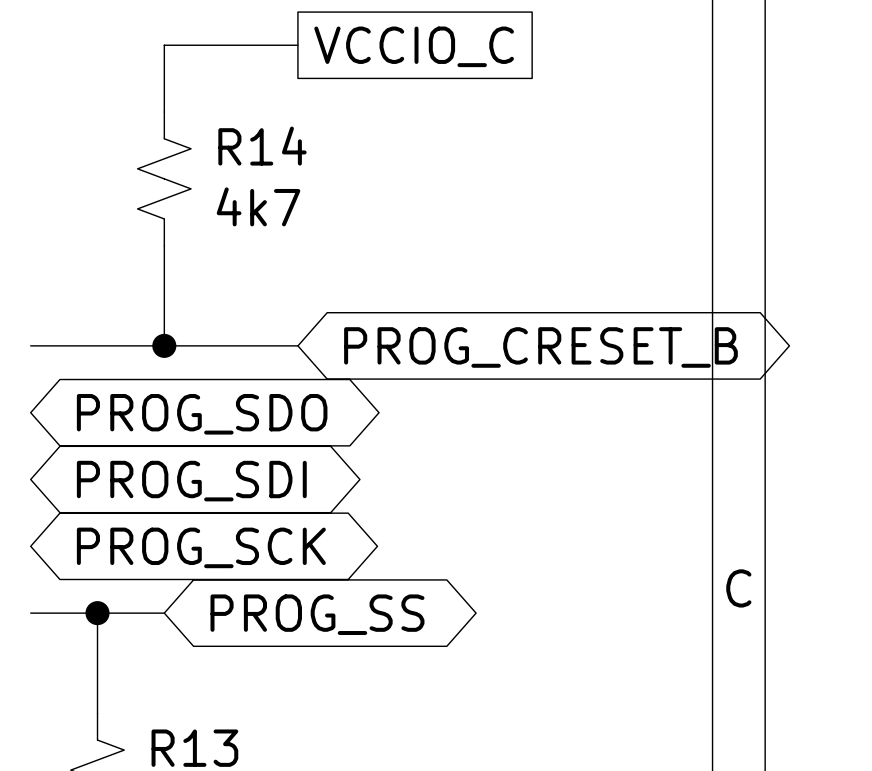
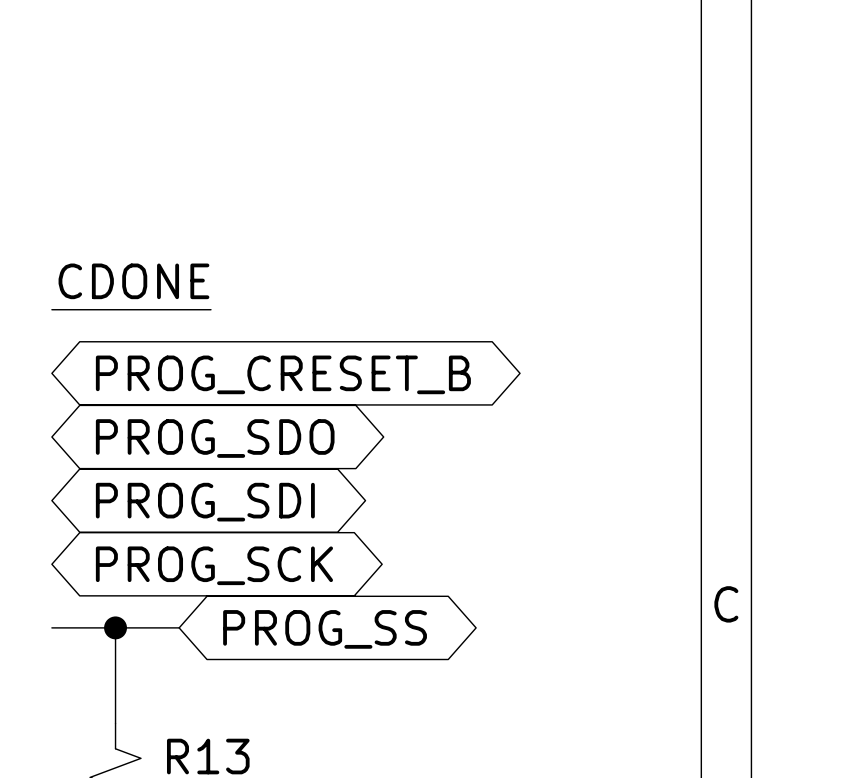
wire: (297, 45) (164, 45) (164, 112) -> none
global label: VCCIO_C (414, 46) -> none
R14: 4k7 (164, 178) -> none
wire: (164, 245) (164, 345) -> none
label: none -> CDONE (133, 281)
wire: none -> (51, 309) (210, 309)
wire: (30, 345) (297, 345) -> none
junction: (164, 345) -> none
global label position: PROG_CRESET_B (540, 347) -> PROG_CRESET_B (283, 374)

